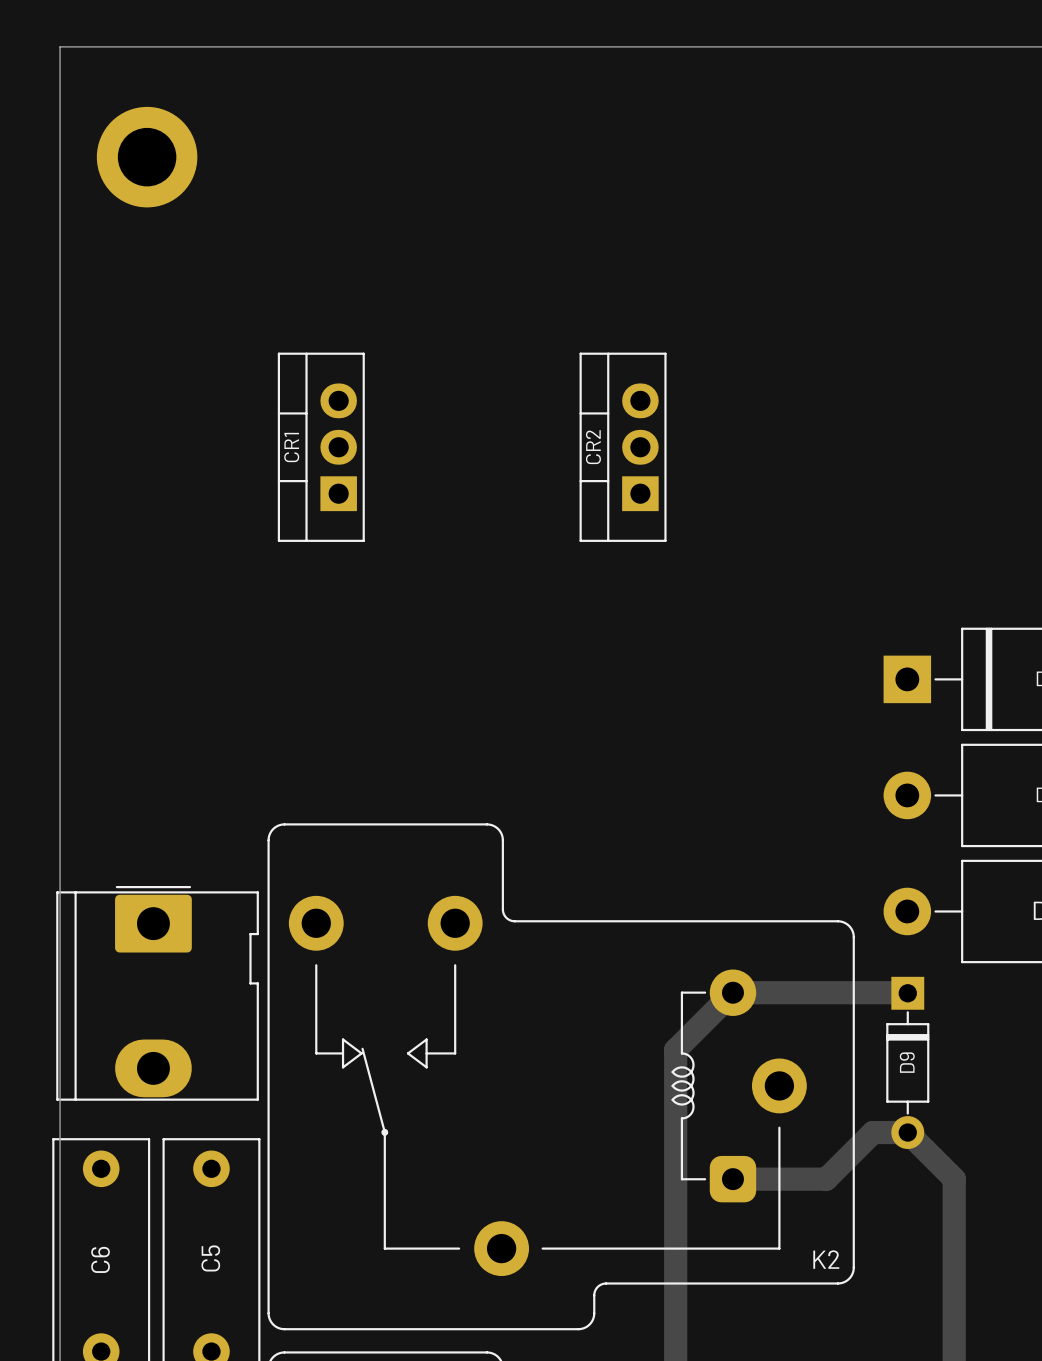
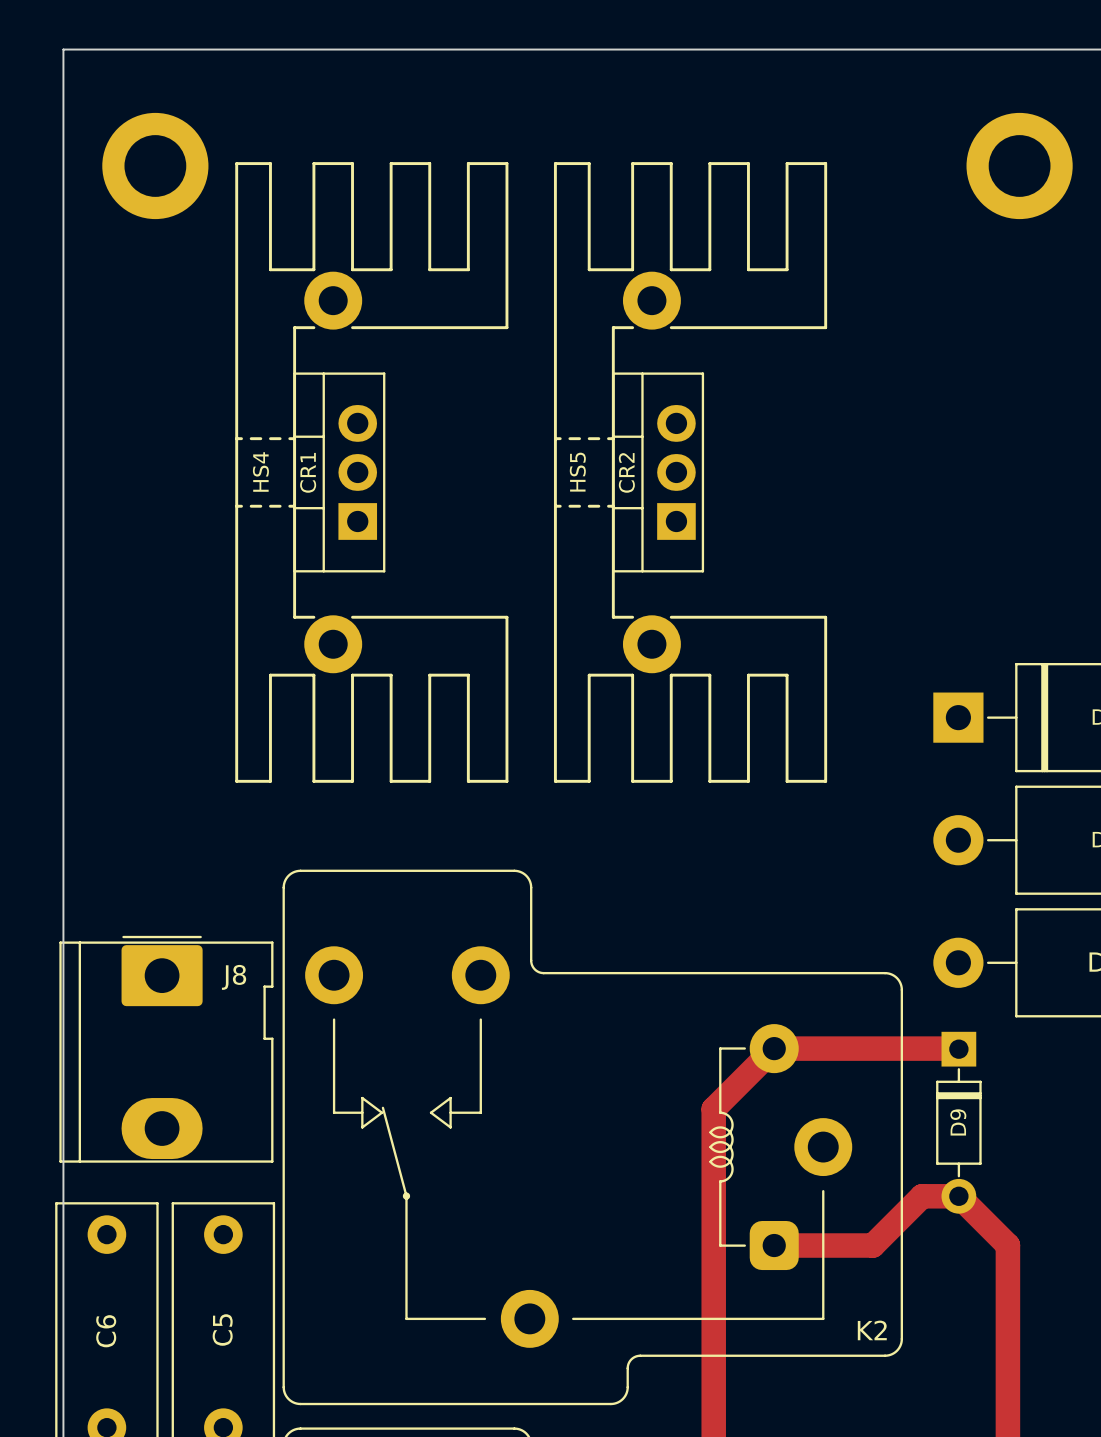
part: none -> (1019, 165)
HS4: none -> (371, 472)
HS5: none -> (690, 472)
J8 name: none -> J8 (234, 977)

